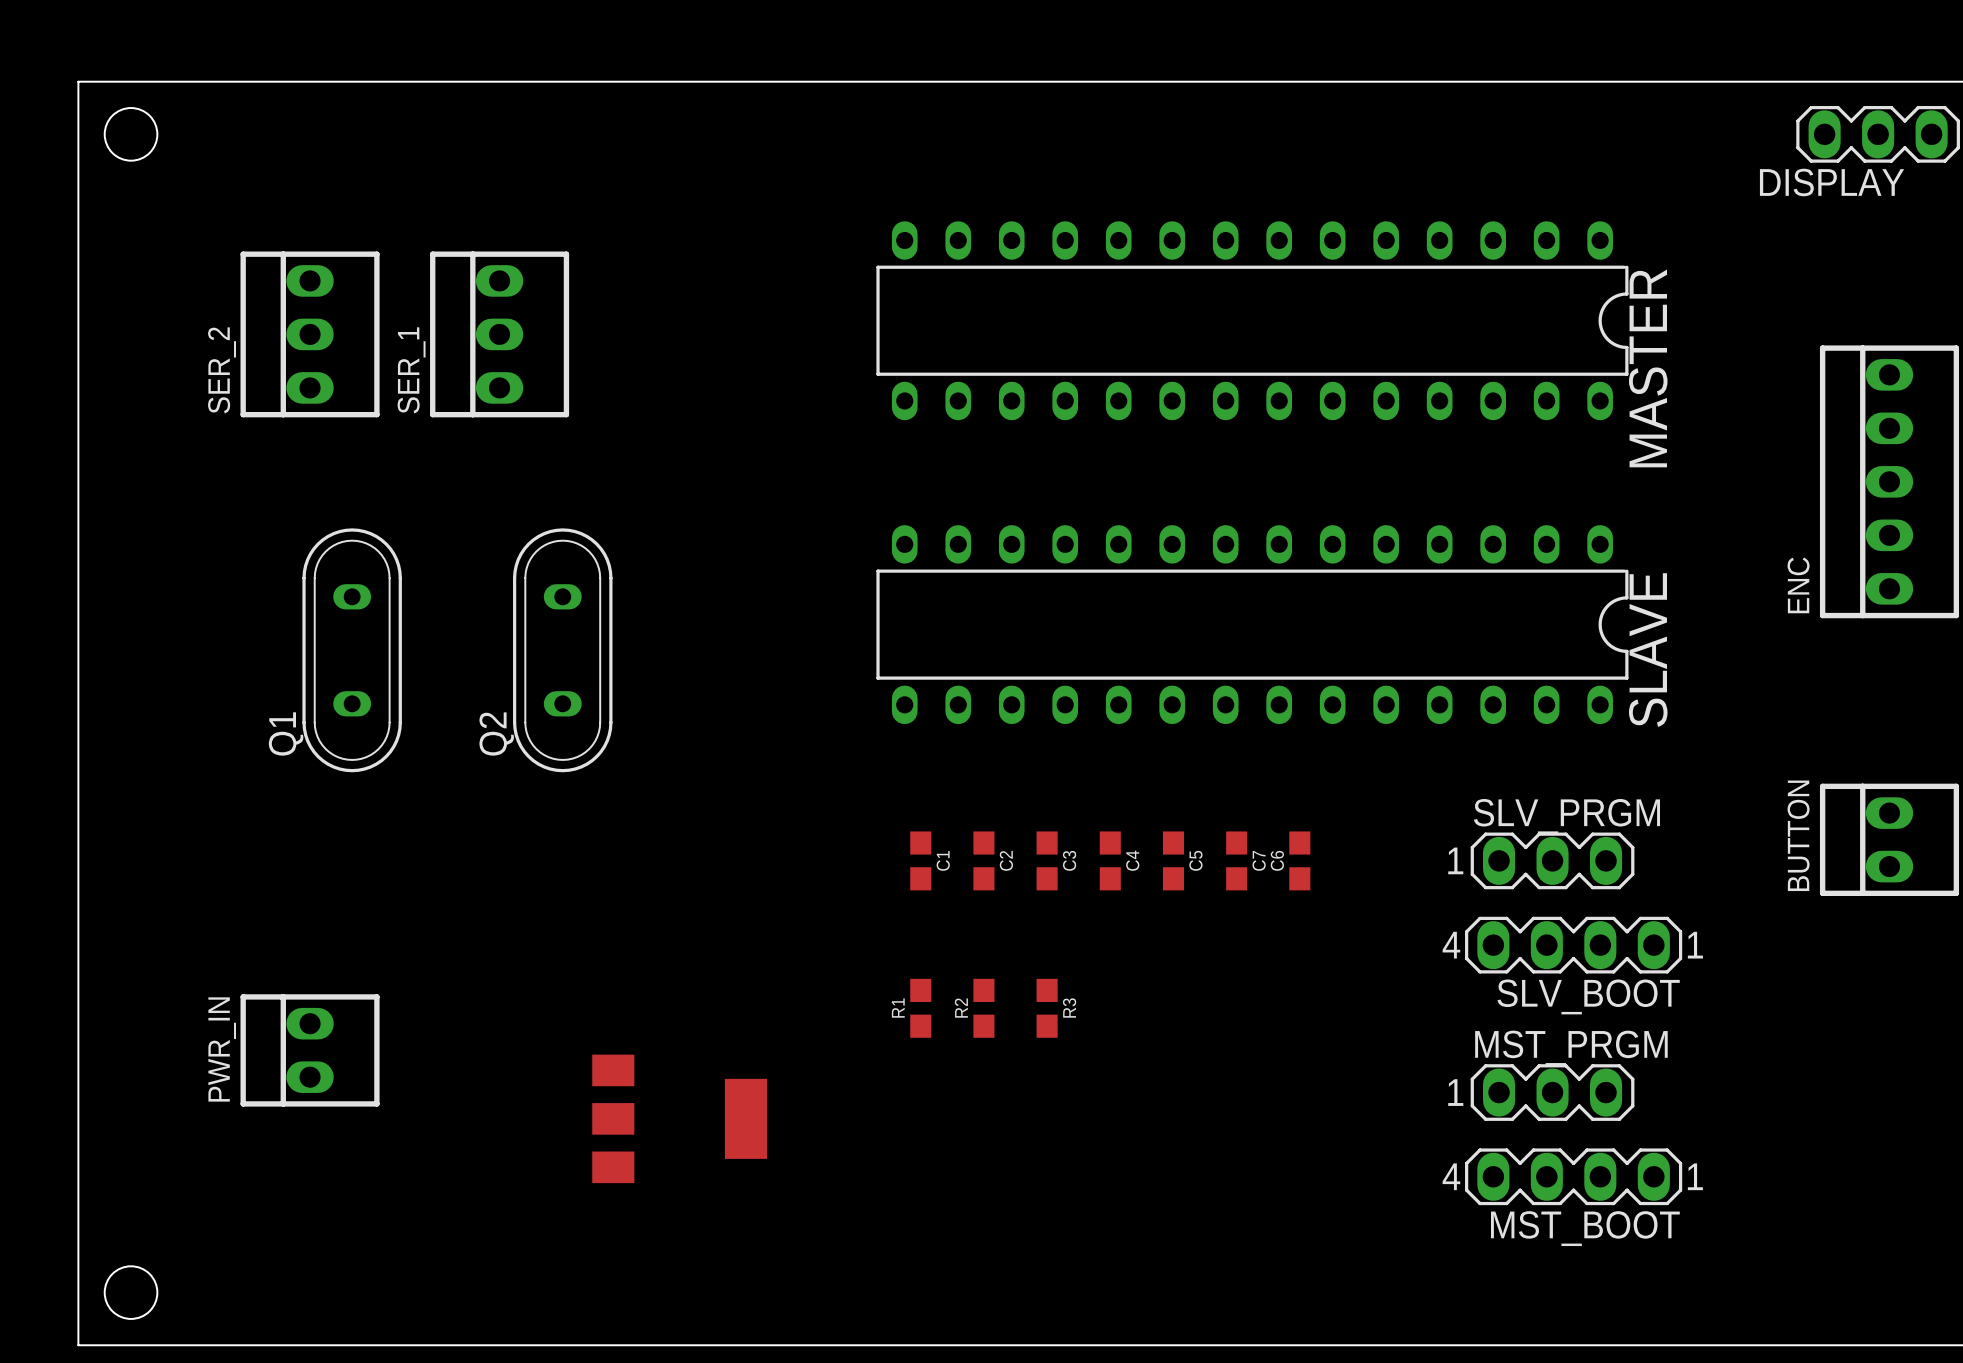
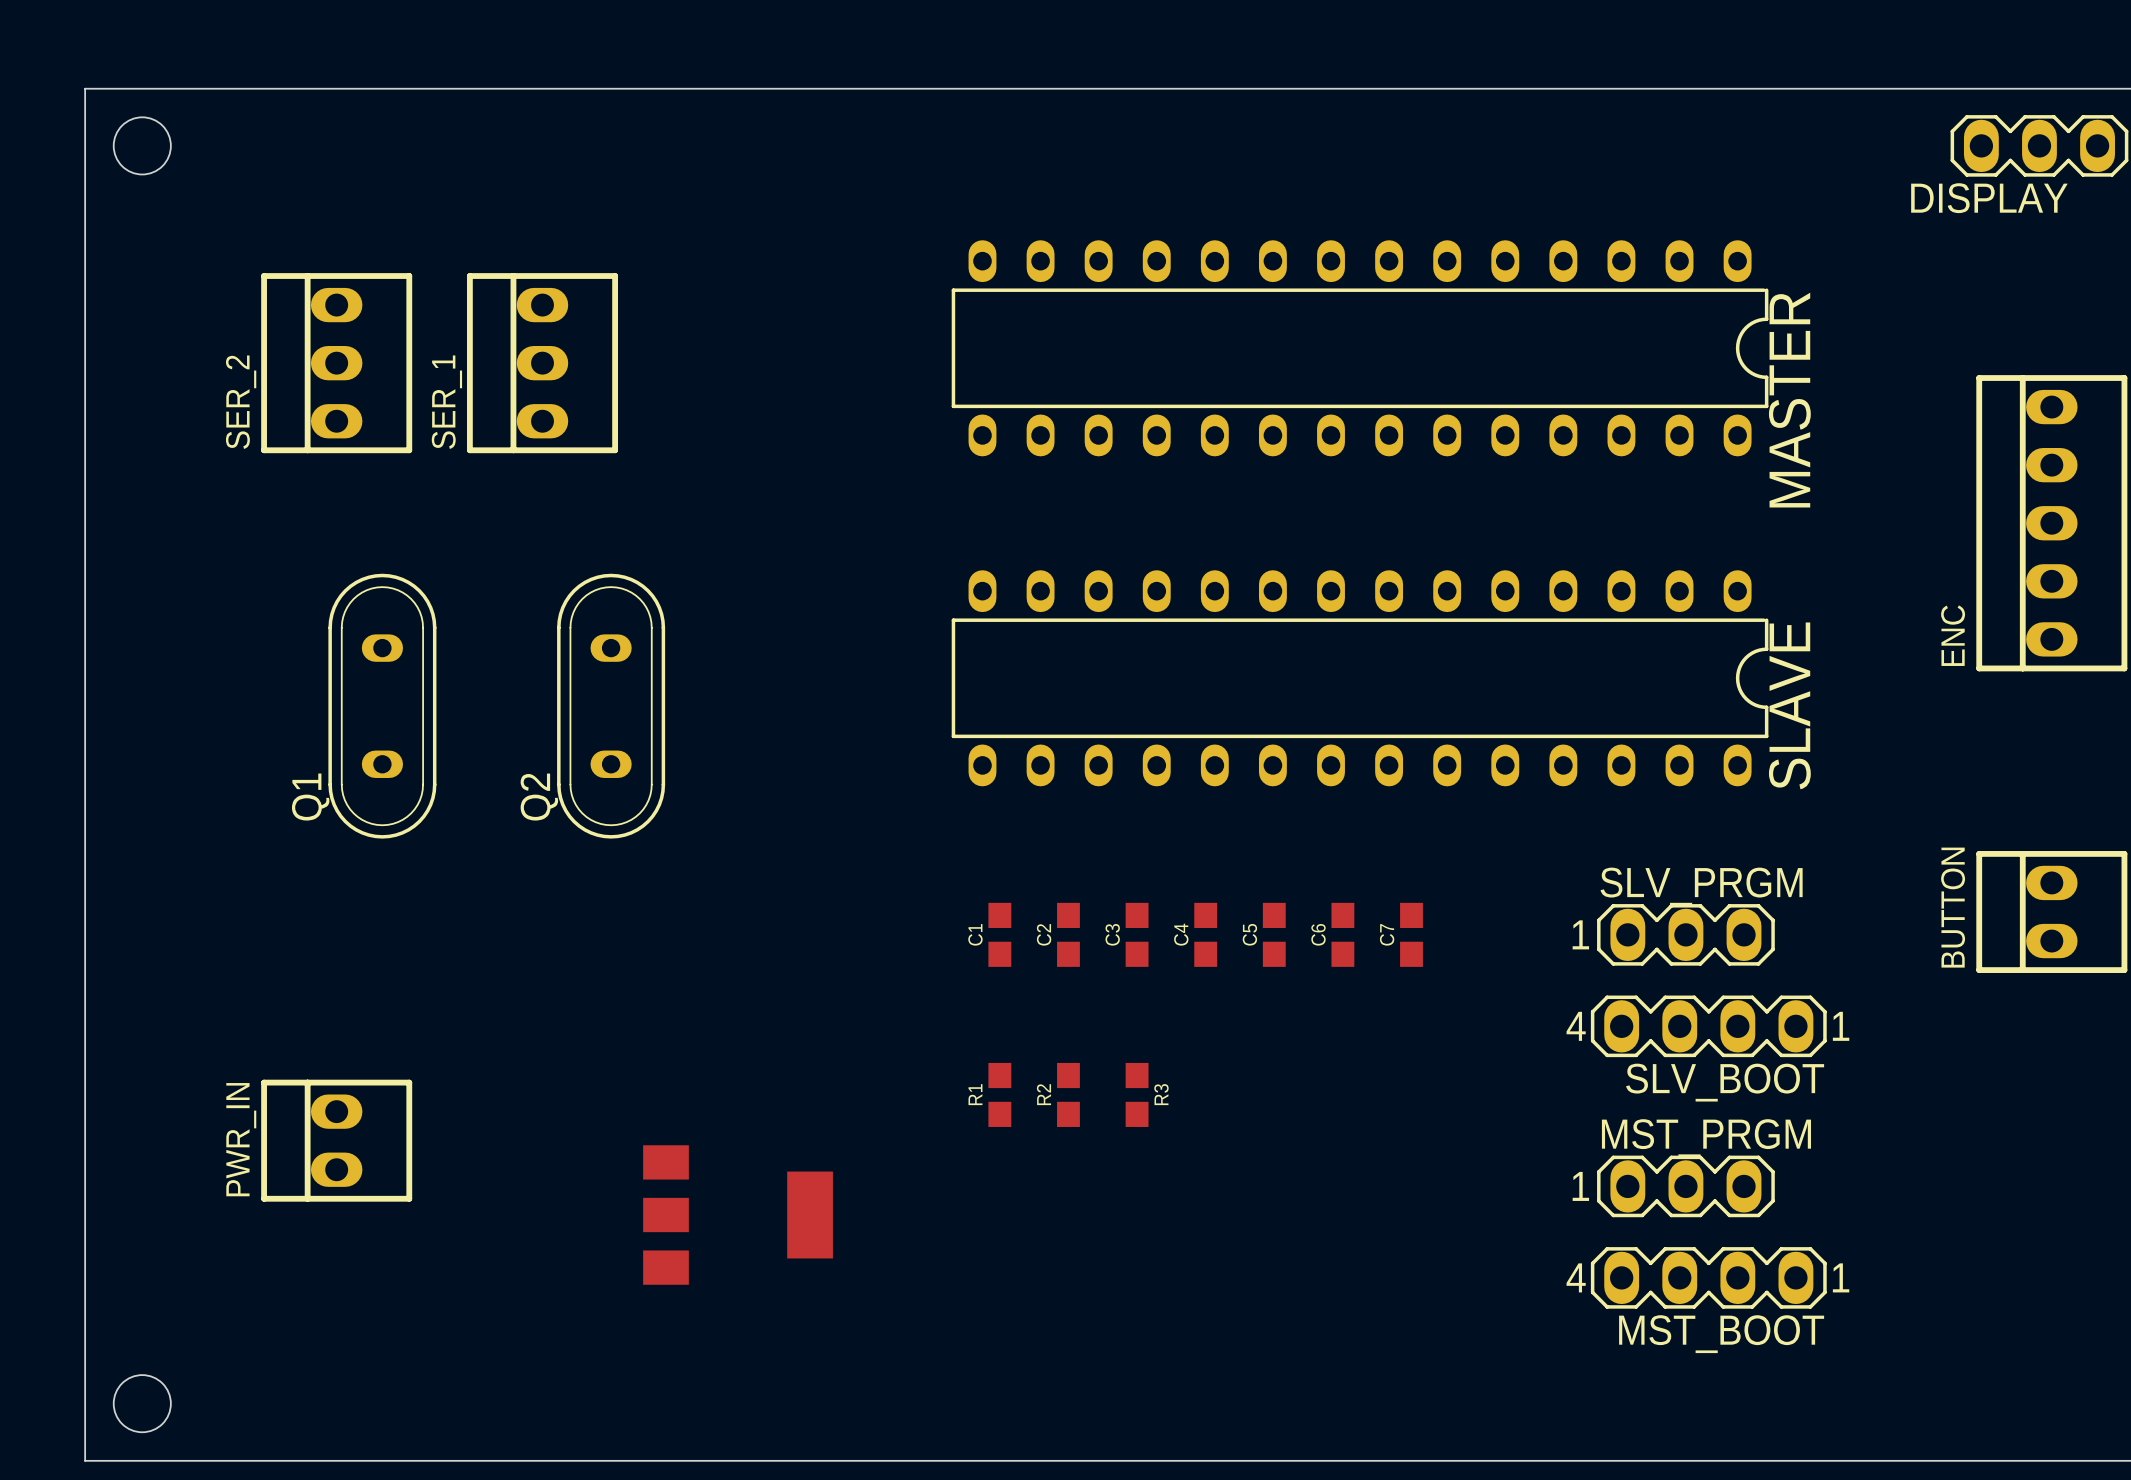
C1 name position: C1 (943, 860) -> C1 (975, 934)
C2 name position: C2 (1006, 860) -> C2 (1044, 934)
C3 name position: C3 (1069, 860) -> C3 (1112, 934)
C4 name position: C4 (1132, 860) -> C4 (1181, 934)
C5 name position: C5 (1195, 860) -> C5 (1249, 934)
C7 name: C7 (1259, 860) -> C6 (1318, 934)
C6 name: C6 (1277, 860) -> C7 (1387, 934)

